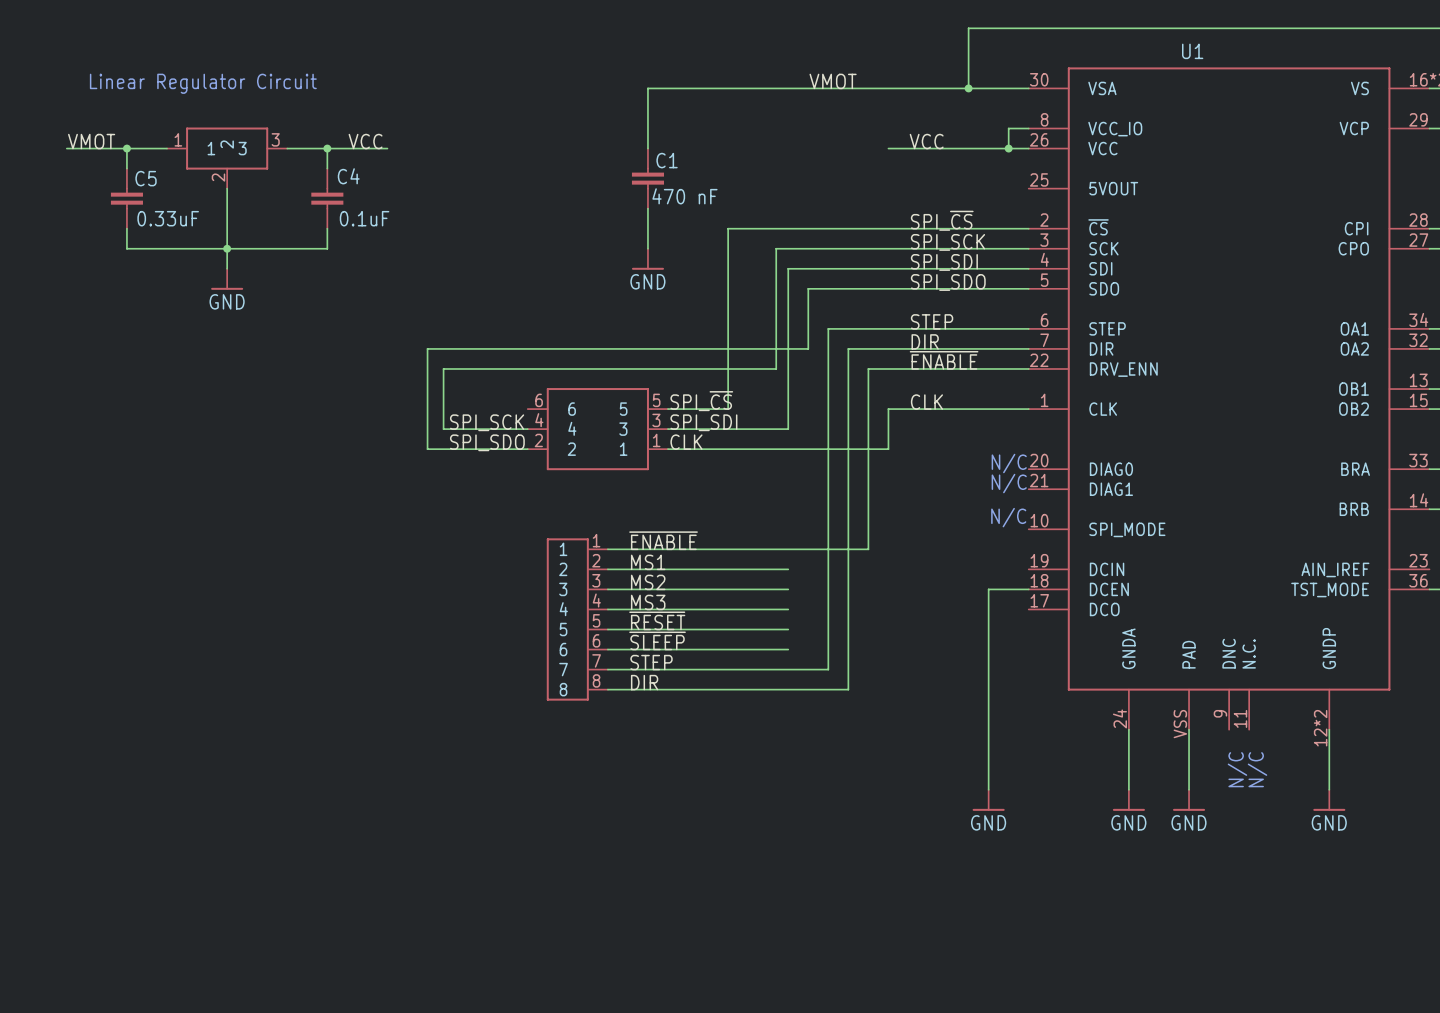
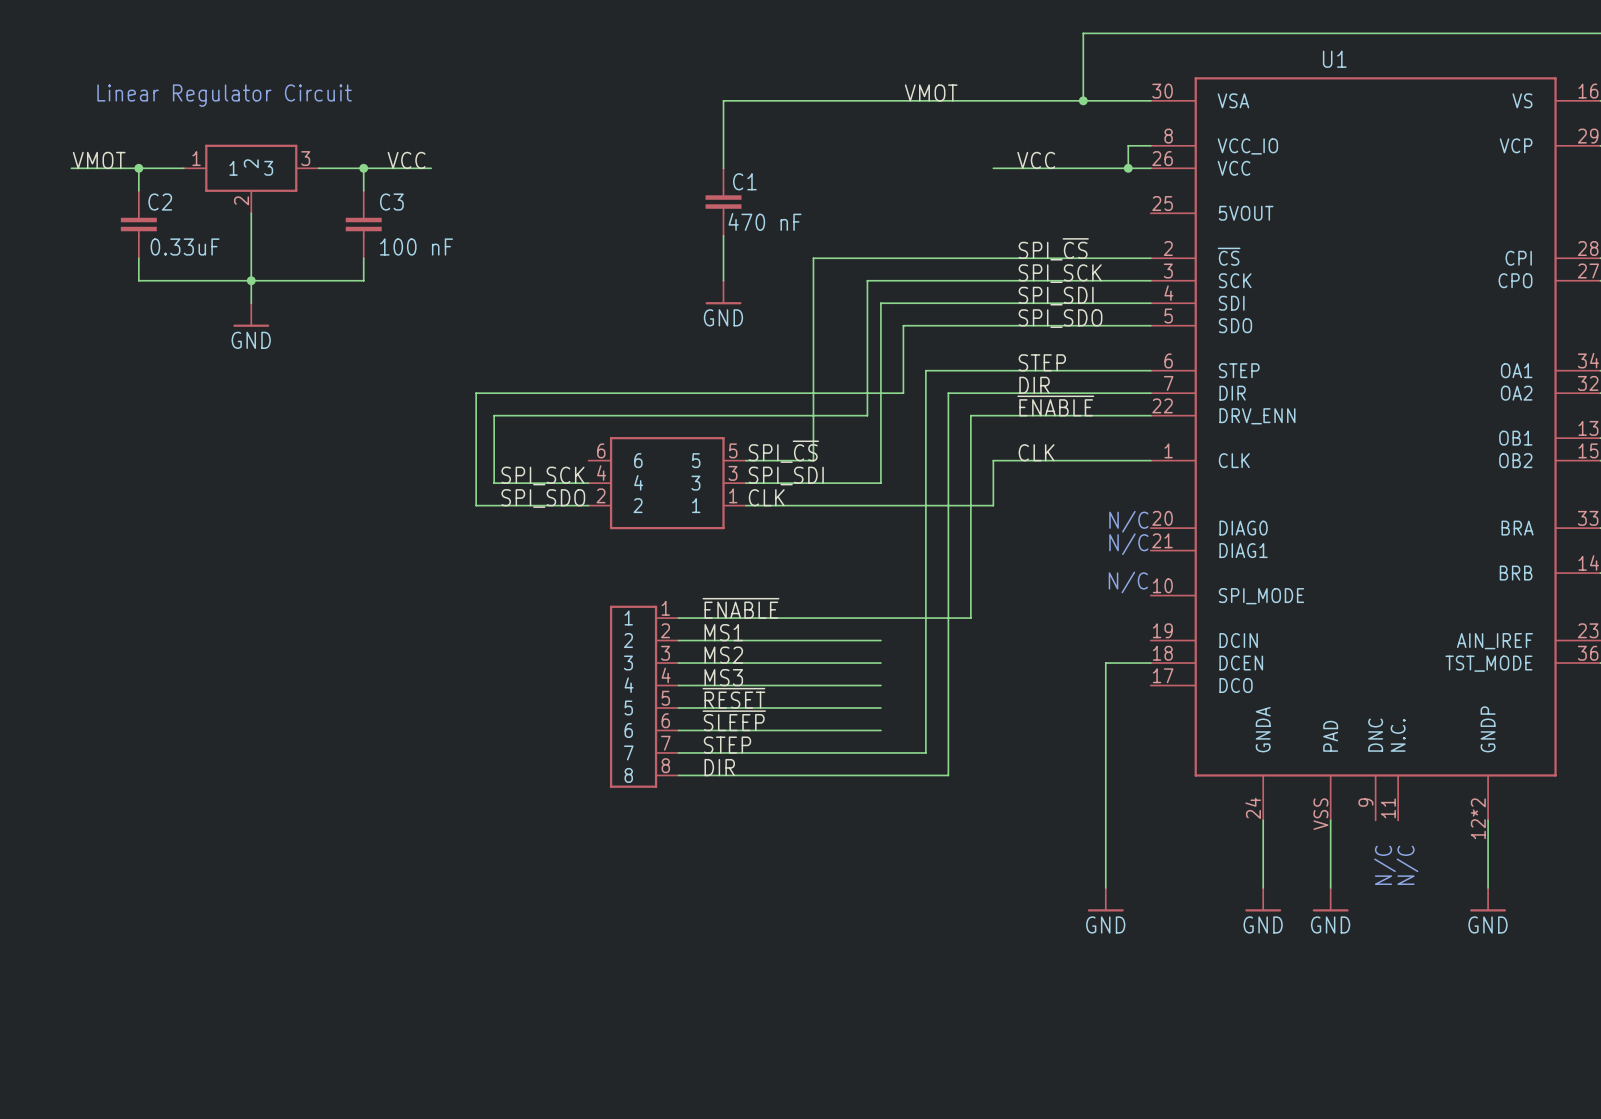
C4 name: C4 (348, 176) -> C3 (391, 202)
C5 name: C5 (146, 178) -> C2 (160, 202)
C4 value: 0.1uF (364, 218) -> 100 nF (416, 247)

